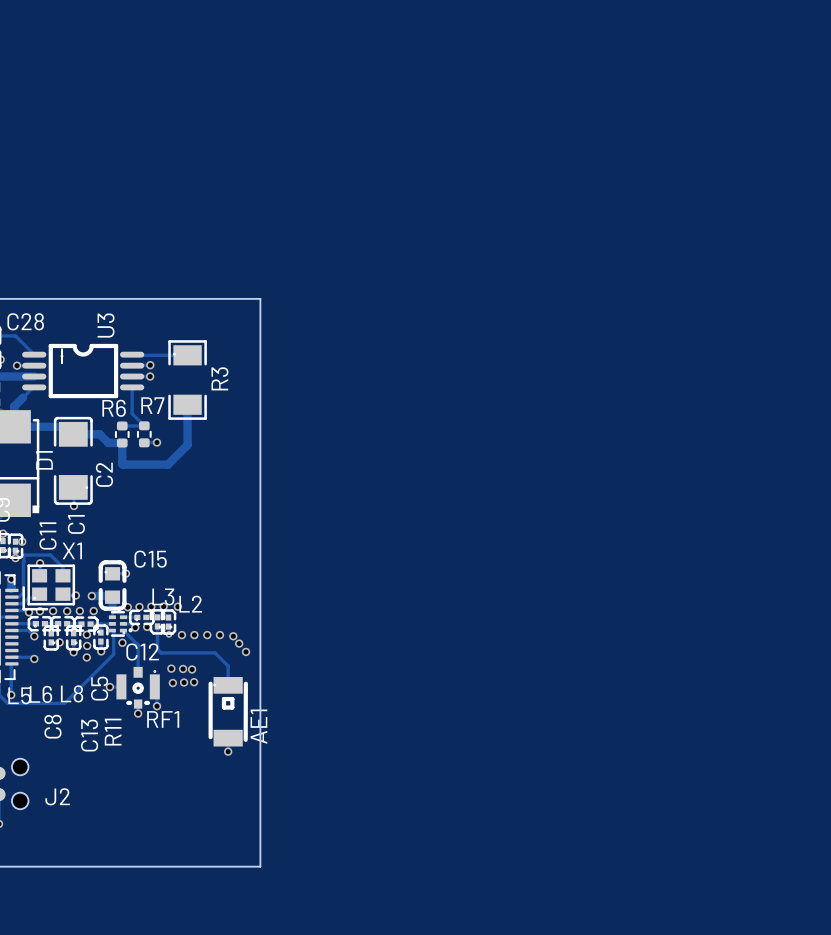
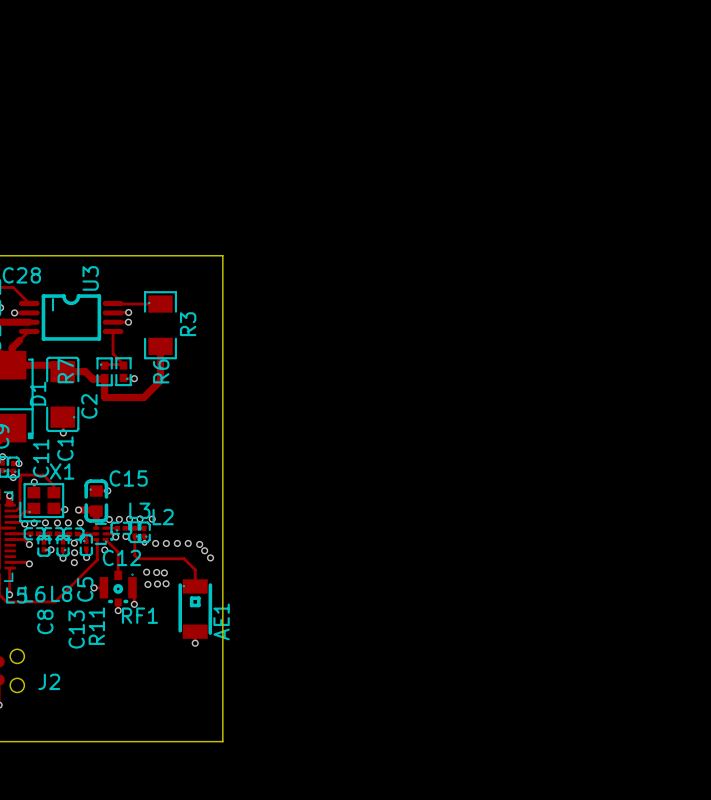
R7 name rotation: 0° (152, 405) -> 90° counterclockwise (65, 370)
R7 name position: R7 (152, 405) -> R7 (65, 370)
R6 name rotation: 0° (114, 408) -> 90° counterclockwise (161, 371)
R6 name position: R6 (114, 408) -> R6 (161, 371)
R6 footprint: [114, 421, 130, 448] -> [96, 357, 113, 387]
R7 footprint: [136, 421, 152, 448] -> [115, 357, 132, 387]

